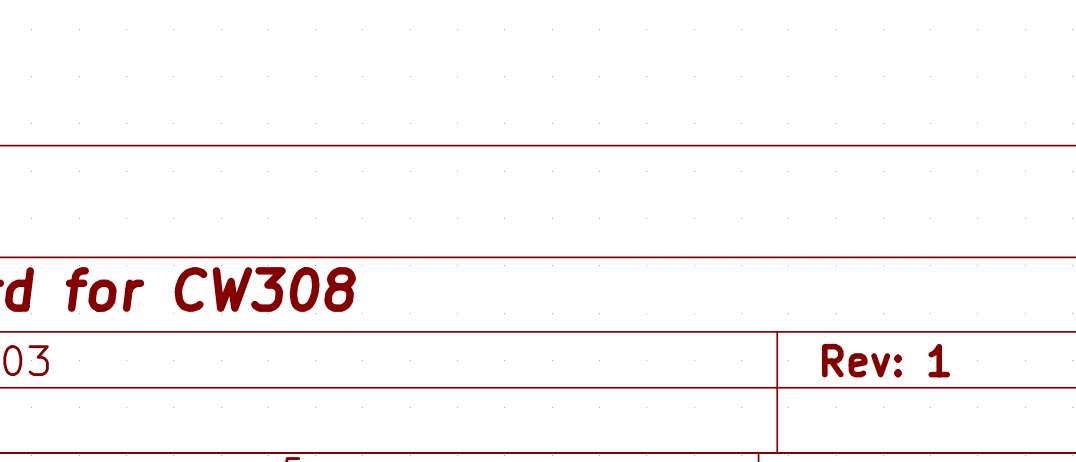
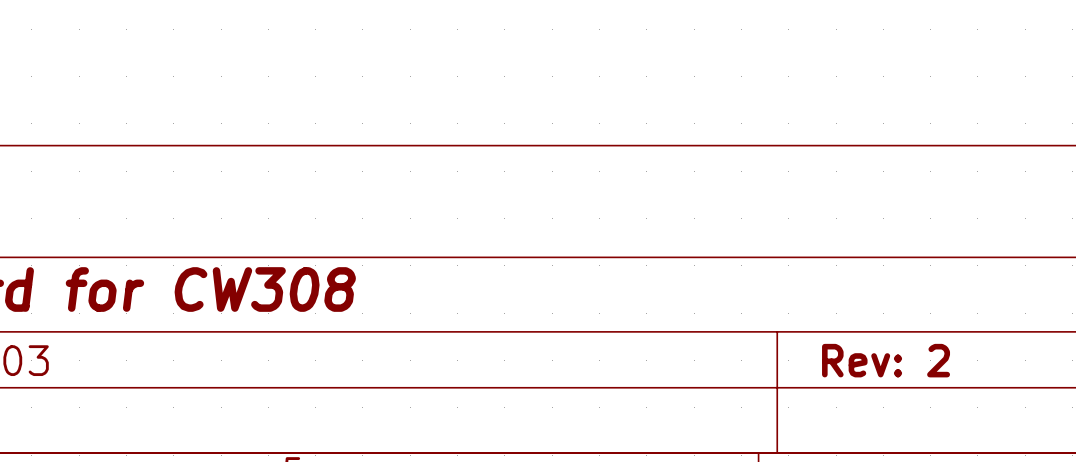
title block: Rev: 1 (886, 360) -> Rev: 2 (886, 360)

